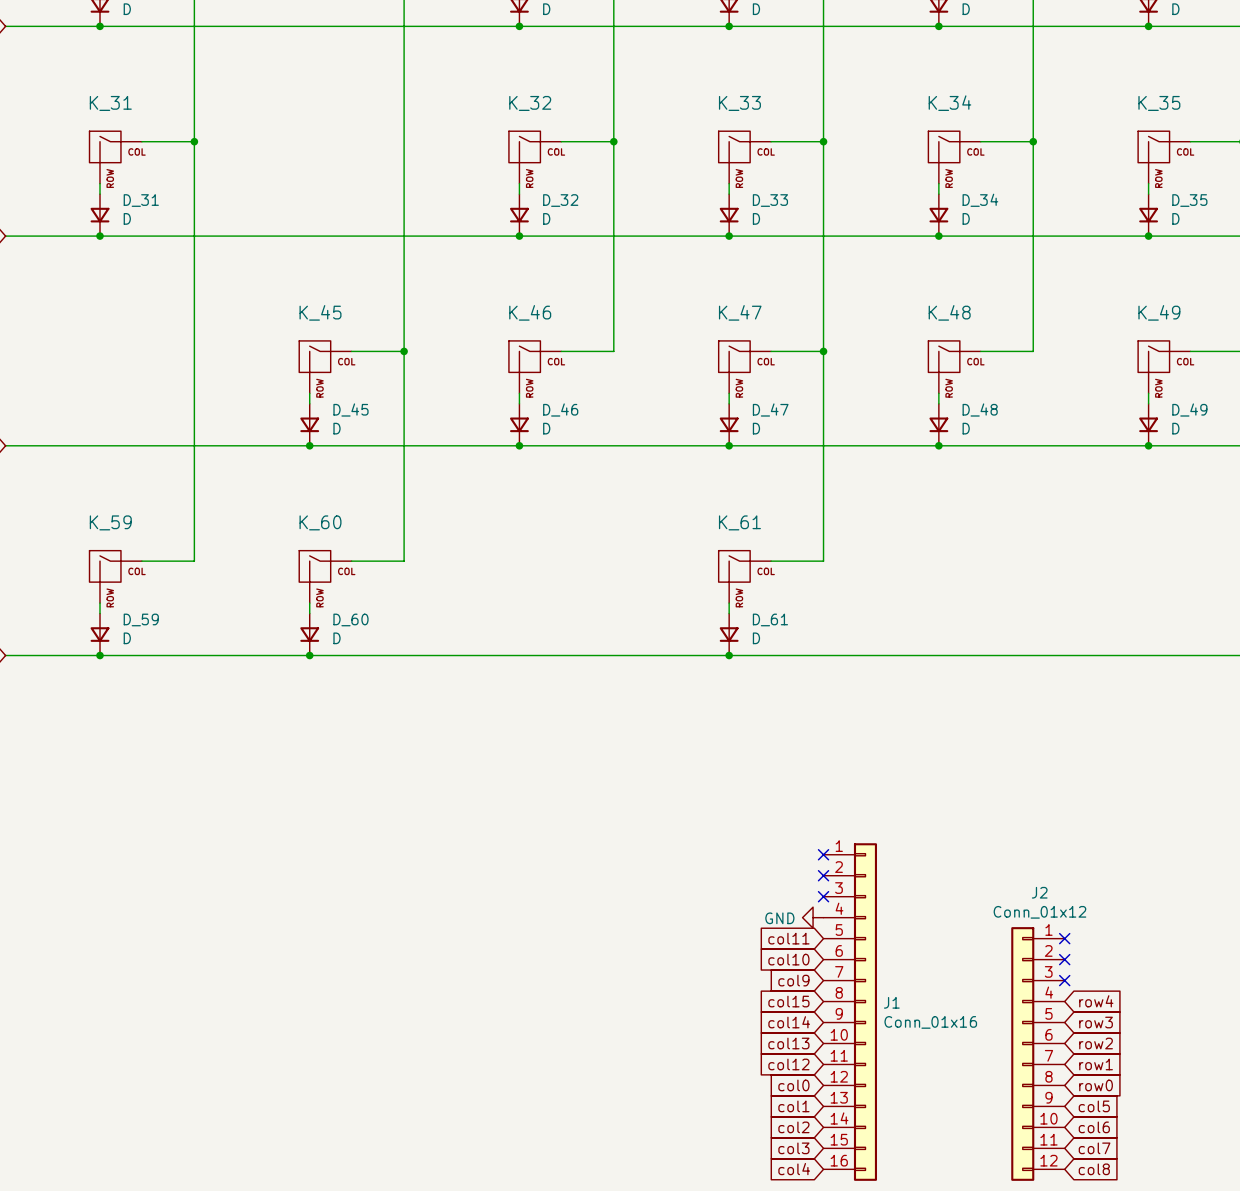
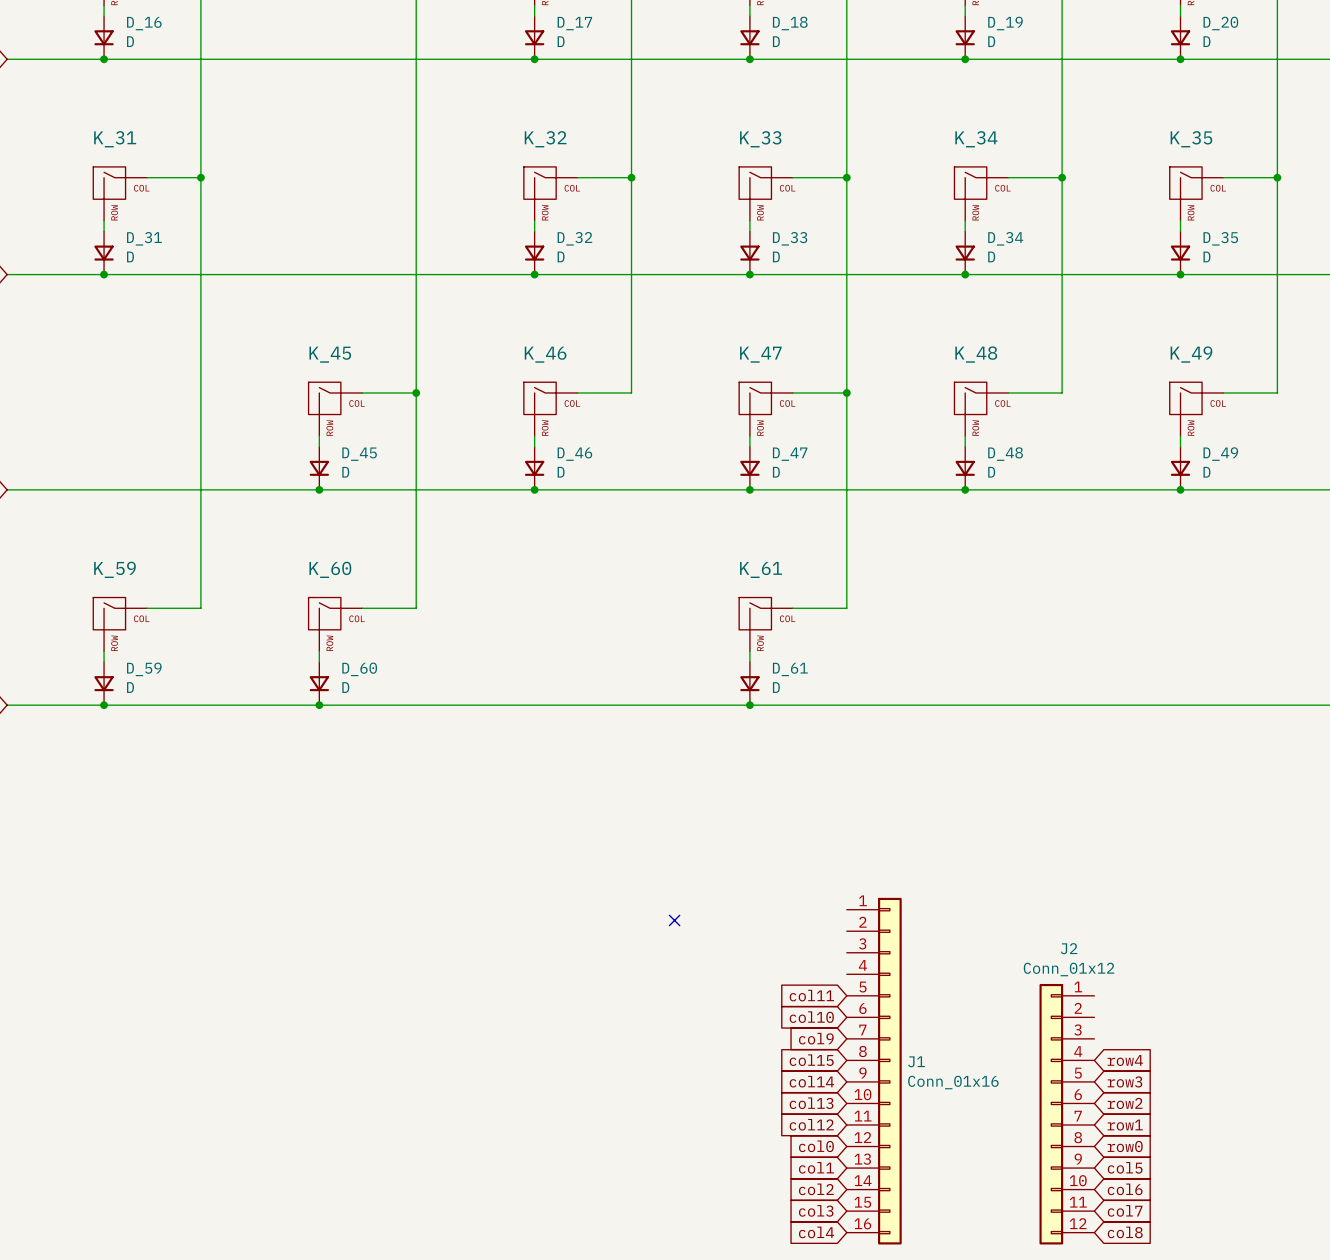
no-connect mark: (823, 854) -> none
no-connect mark: none -> (674, 920)
no-connect mark: (823, 875) -> none
no-connect mark: (823, 896) -> none
power symbol: GND (813, 917) -> none
no-connect mark: (1064, 938) -> none
no-connect mark: (1064, 959) -> none
no-connect mark: (1064, 980) -> none

